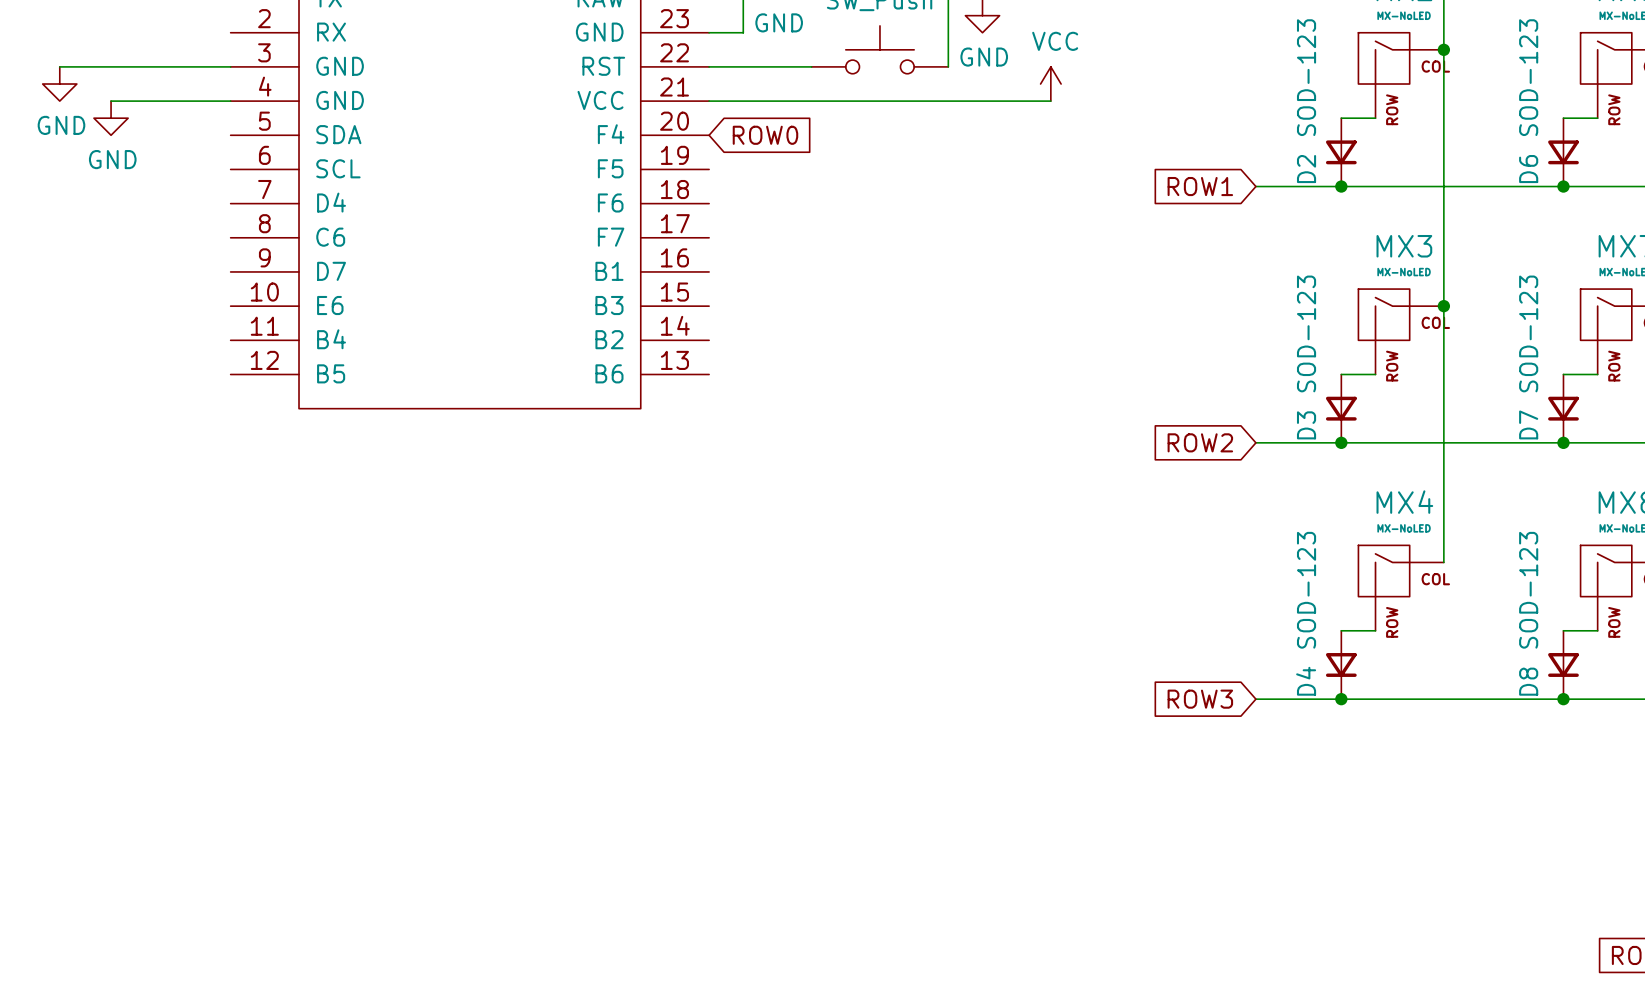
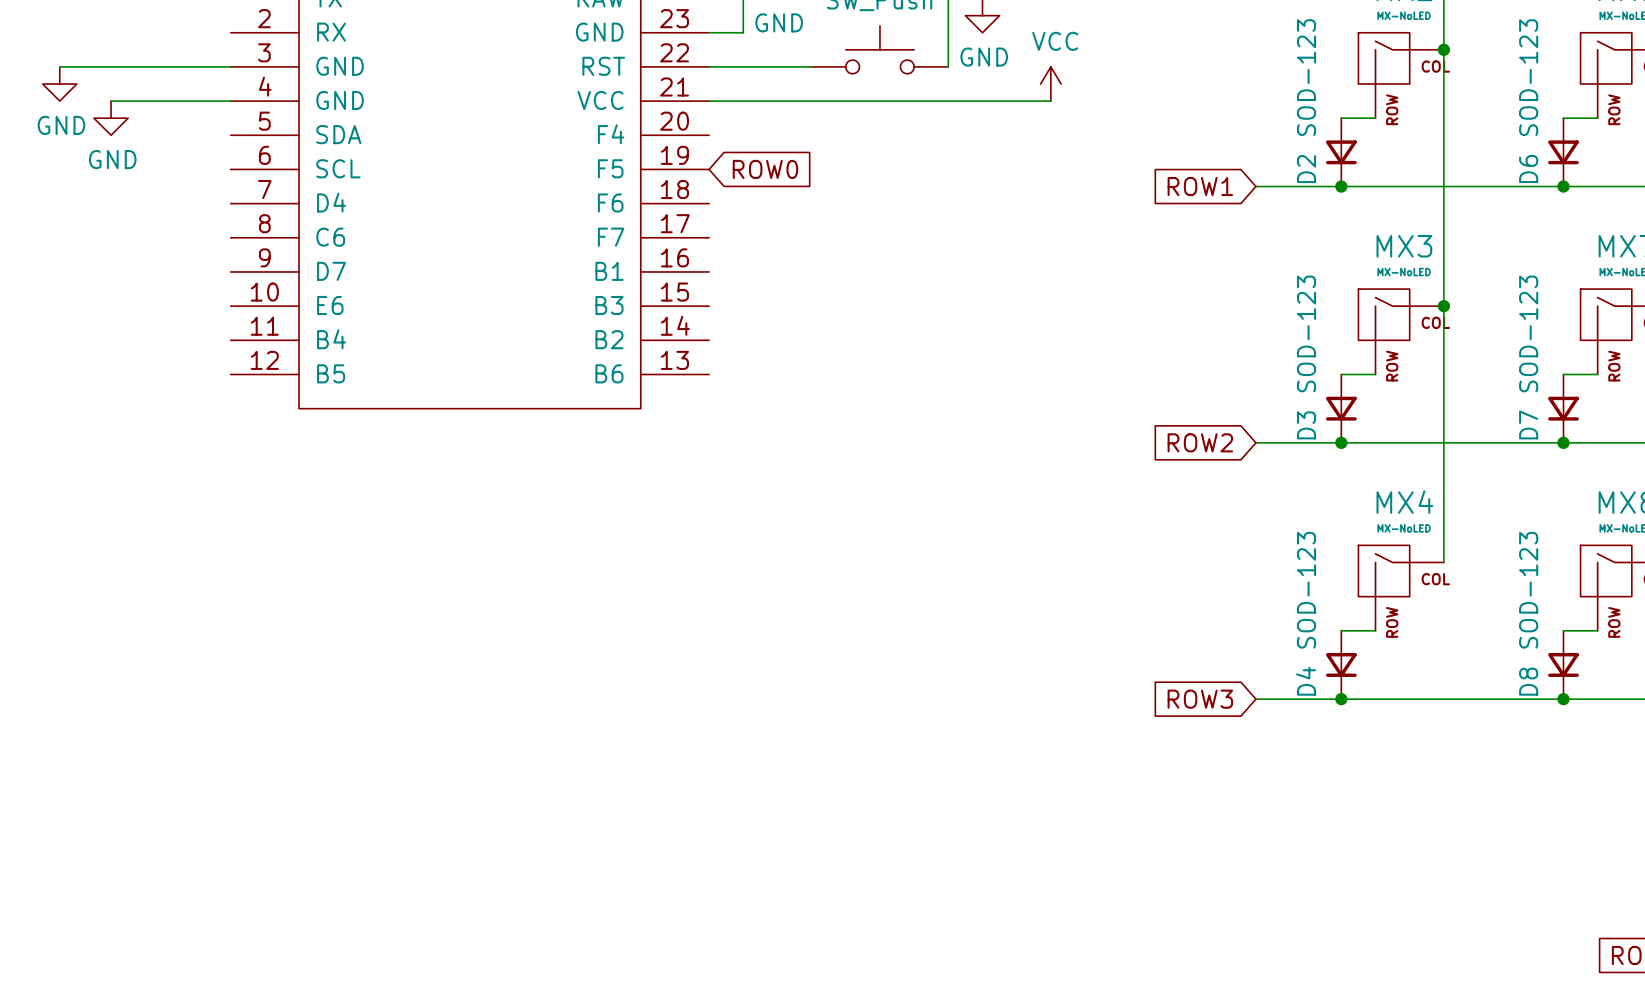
global label position: ROW0 (765, 135) -> ROW0 (765, 169)

